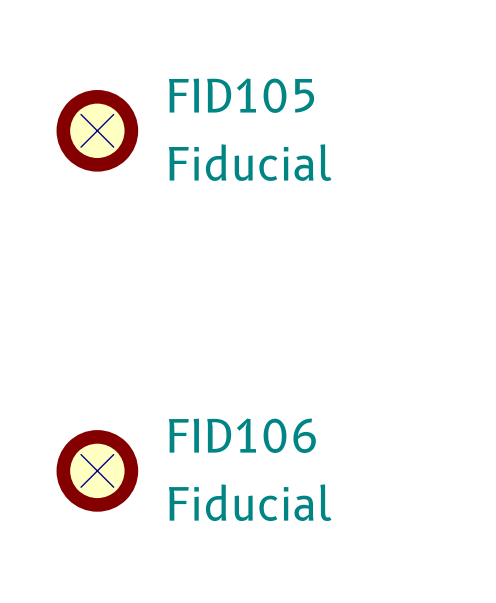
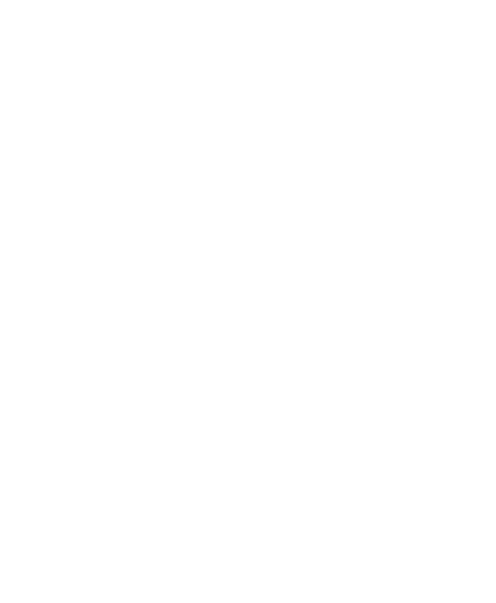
no-connect mark: (97, 130) -> none
FID105: Fiducial (97, 130) -> none
no-connect mark: (97, 470) -> none
FID106: Fiducial (97, 470) -> none

